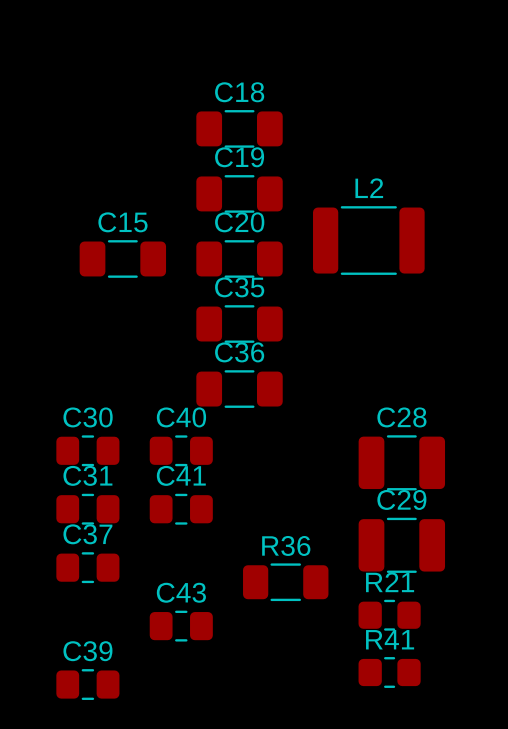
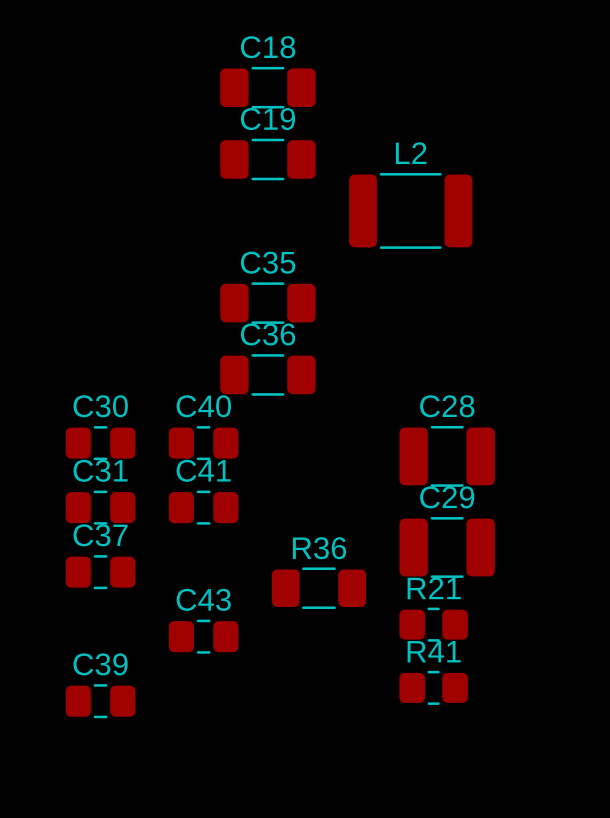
C15: (122, 258) -> none
C20: (239, 258) -> none

